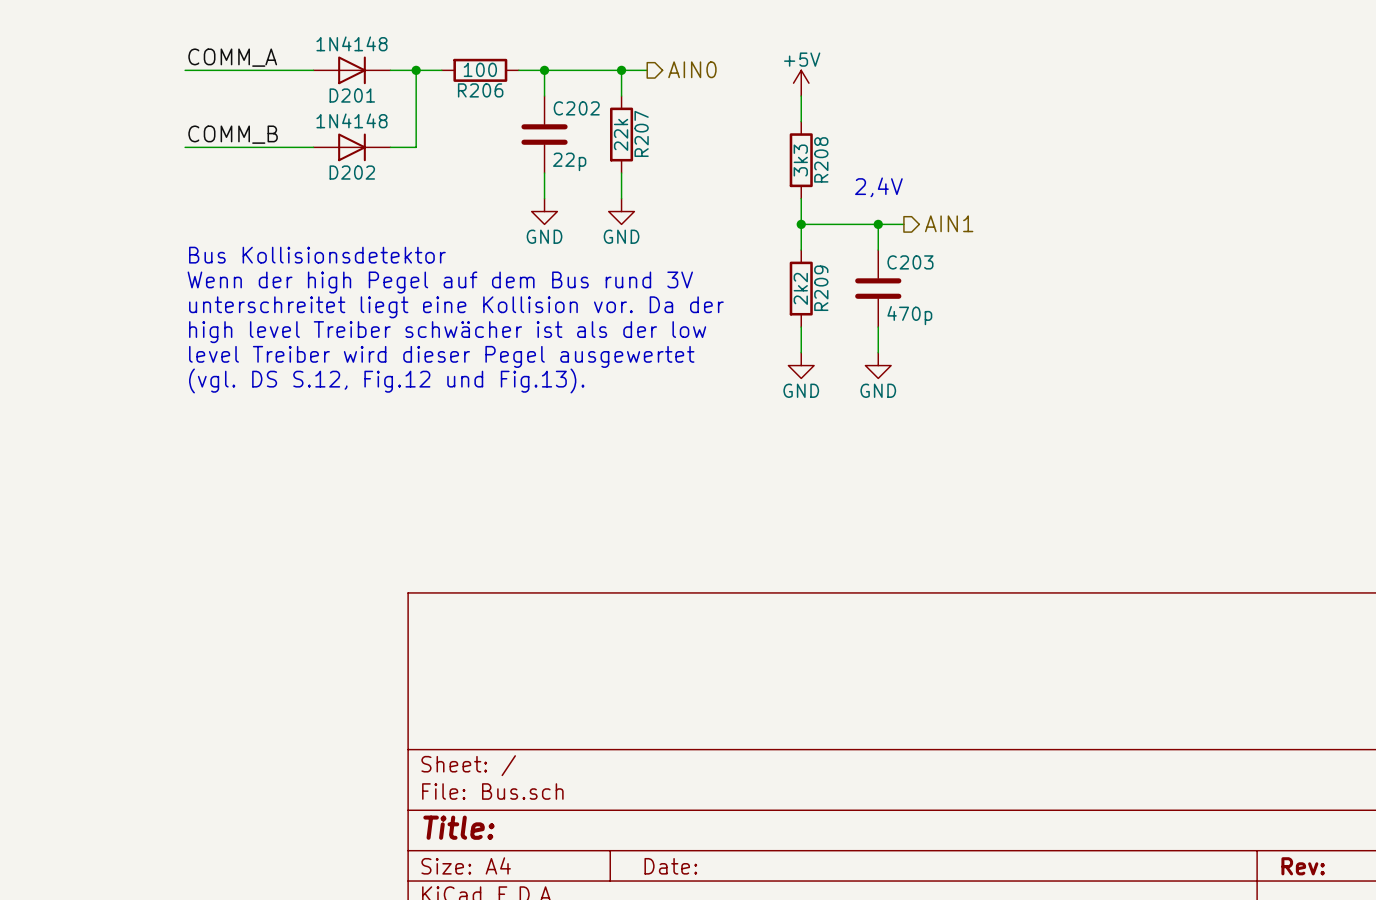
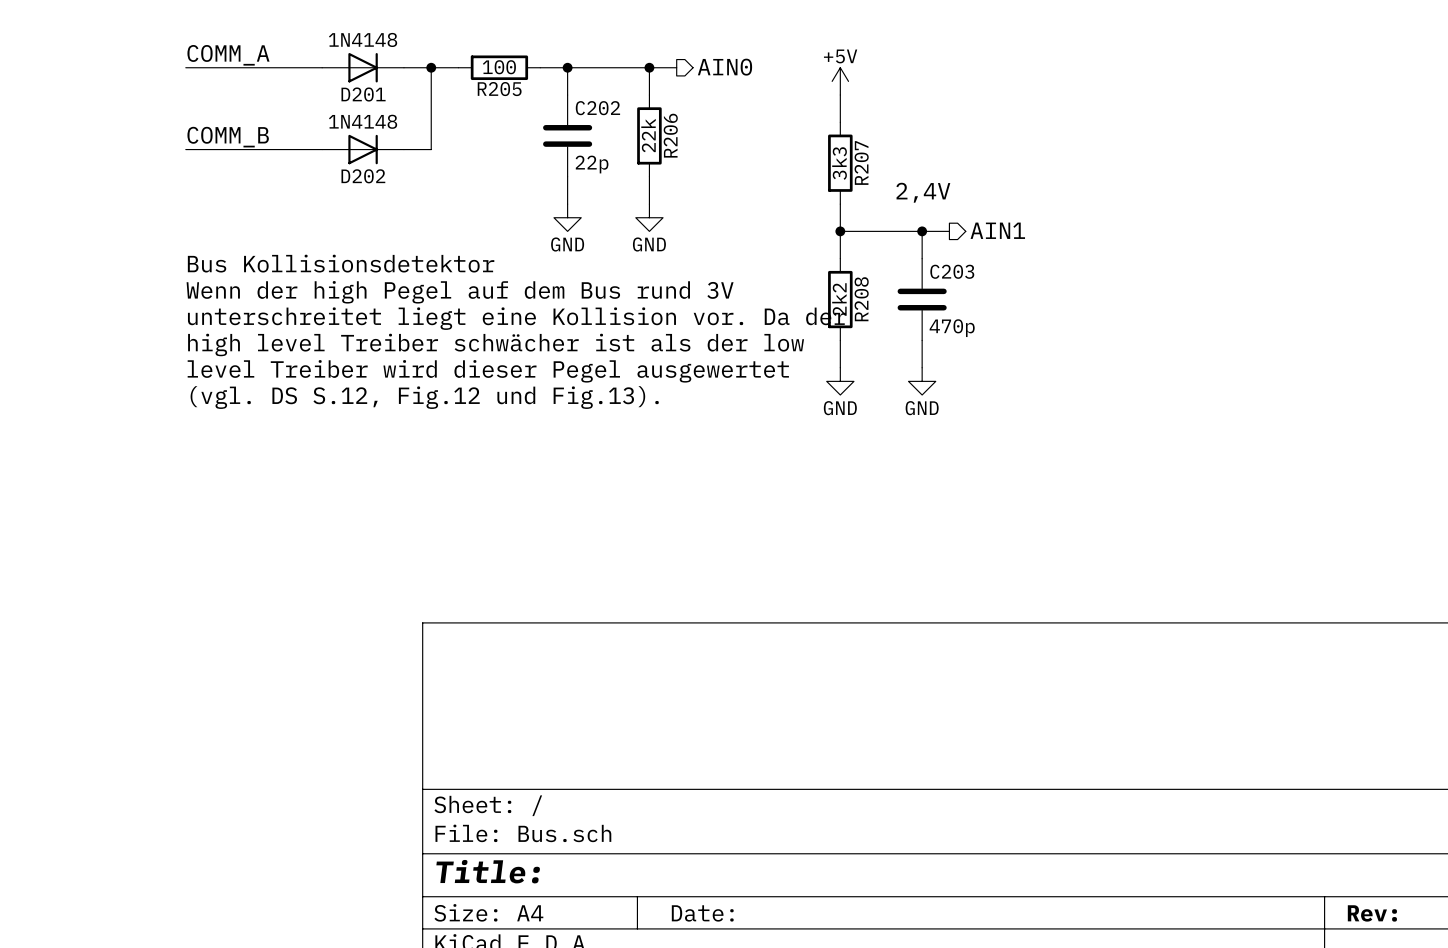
R206 name: R206 (480, 90) -> R205 (499, 89)
R207 name: R207 (641, 133) -> R206 (670, 135)
R208 name: R208 (821, 159) -> R207 (861, 162)
R209 name: R209 (821, 288) -> R208 (861, 299)

